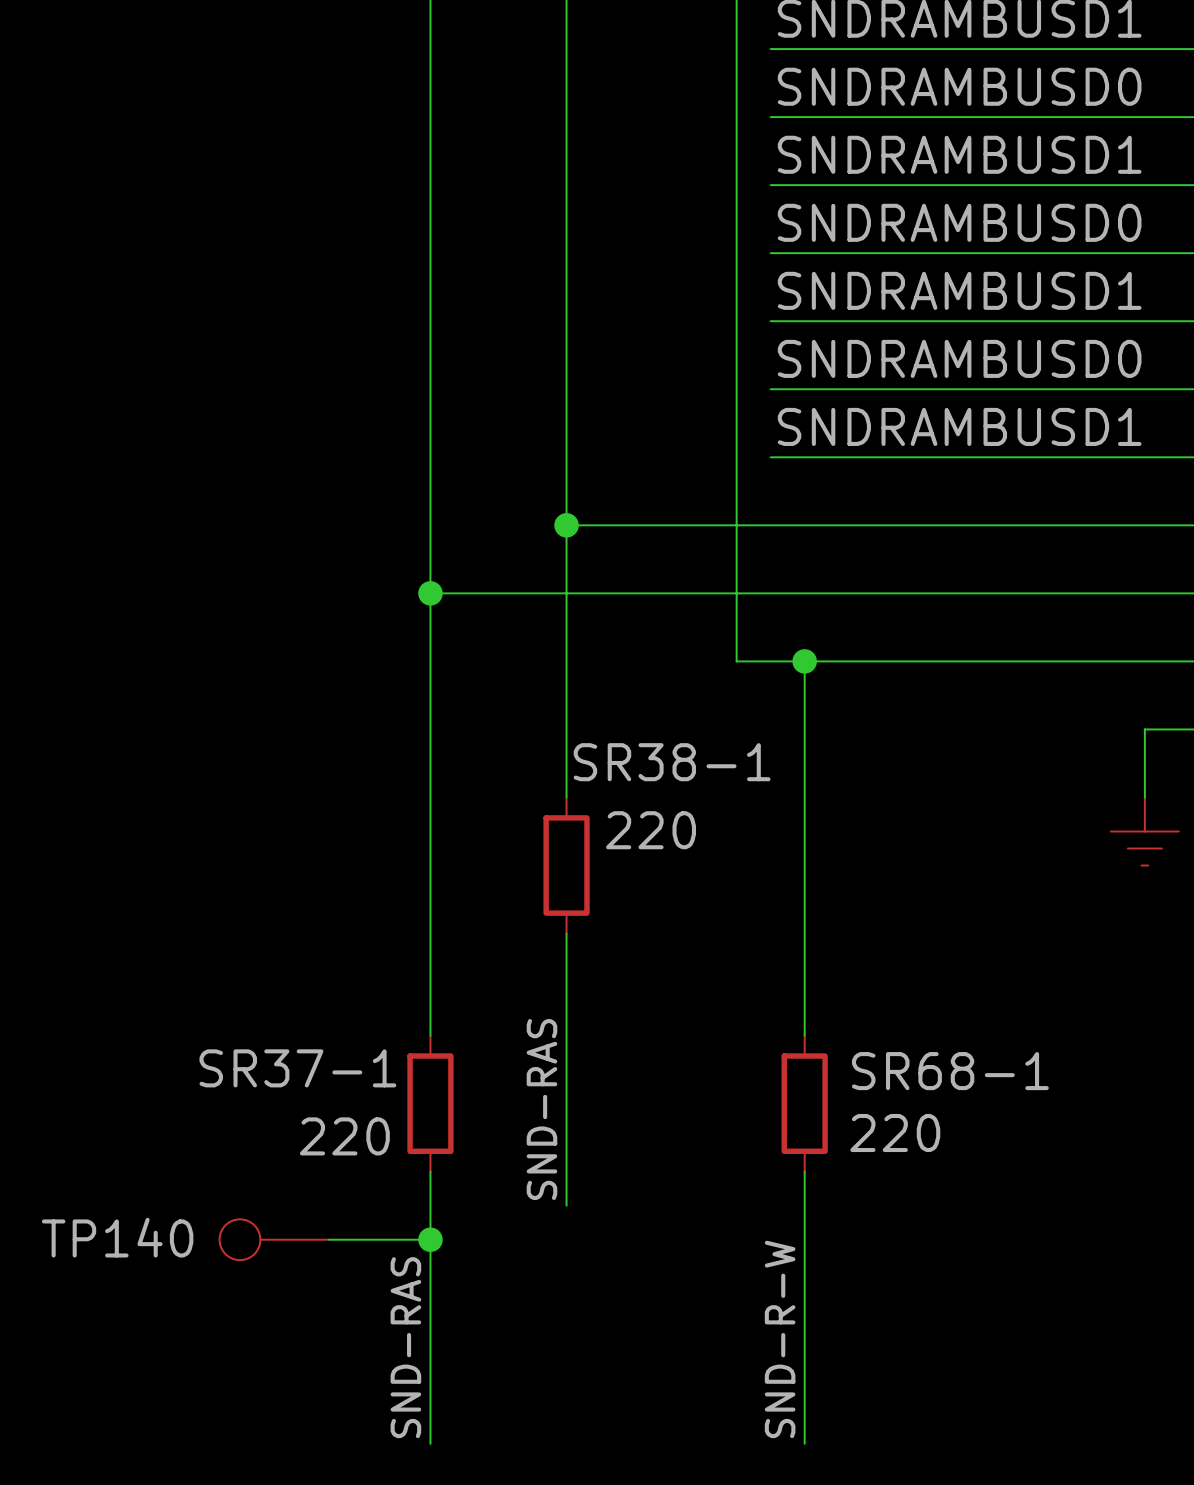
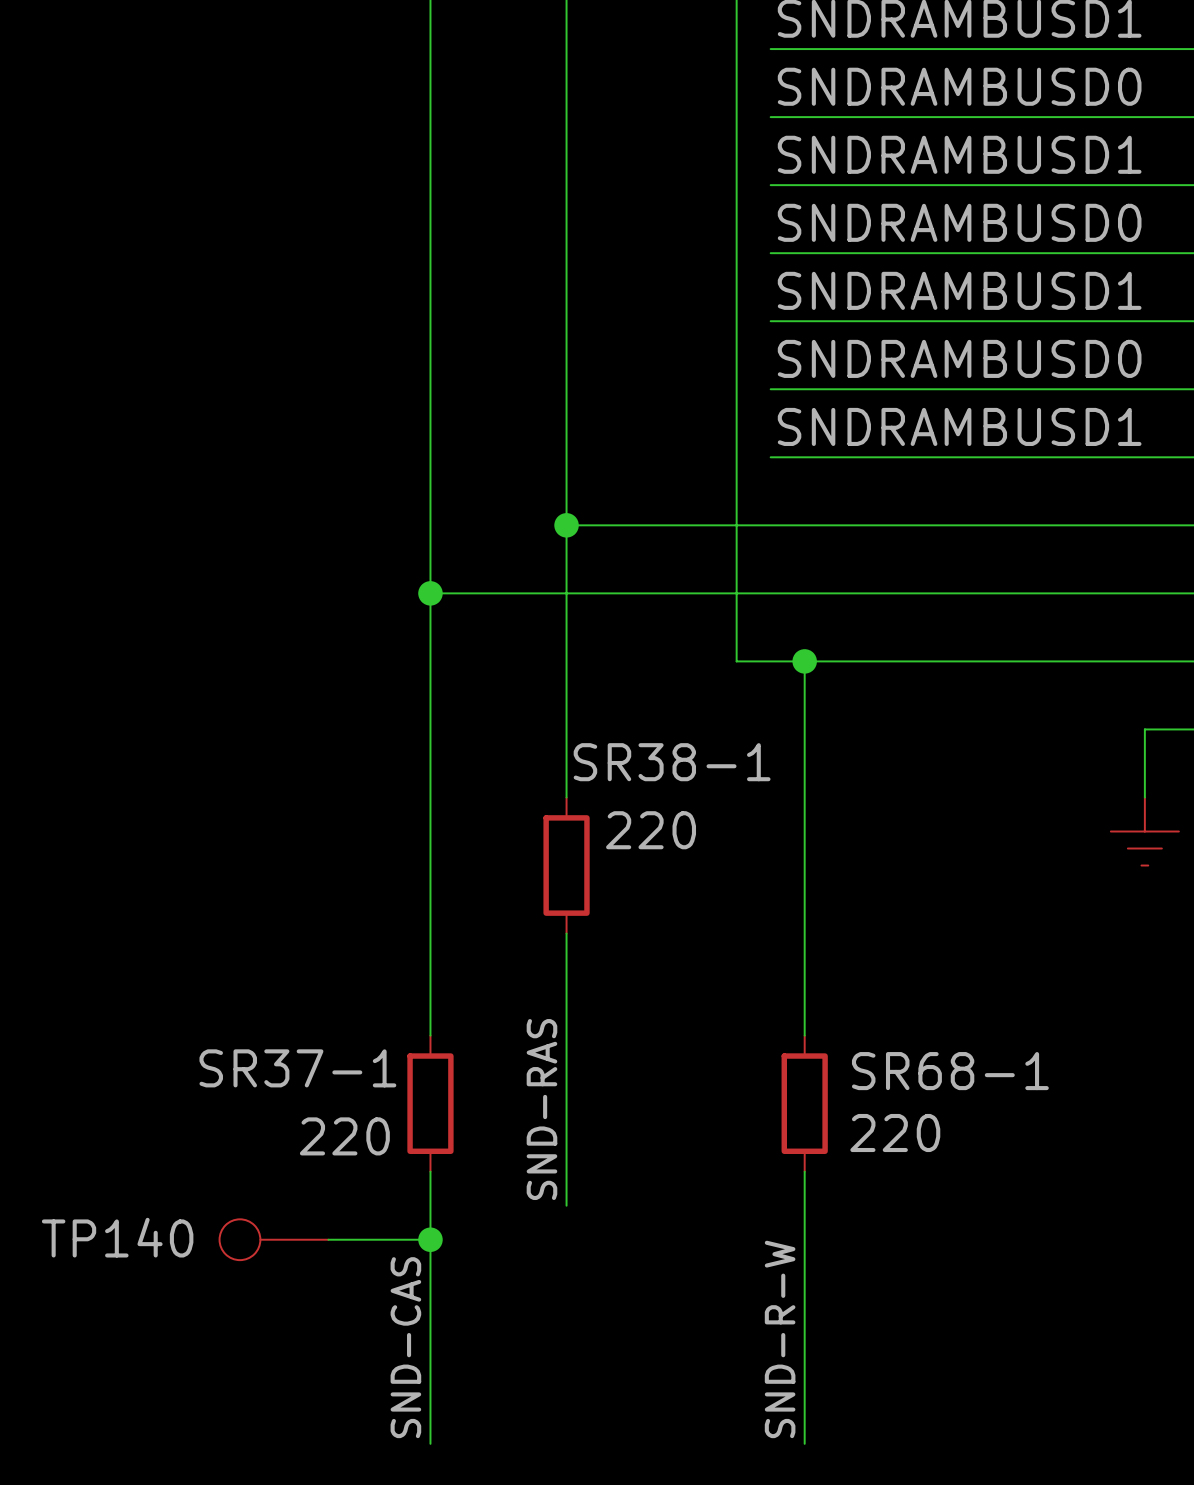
label: SND-RAS (405, 1347) -> SND-CAS (405, 1347)

